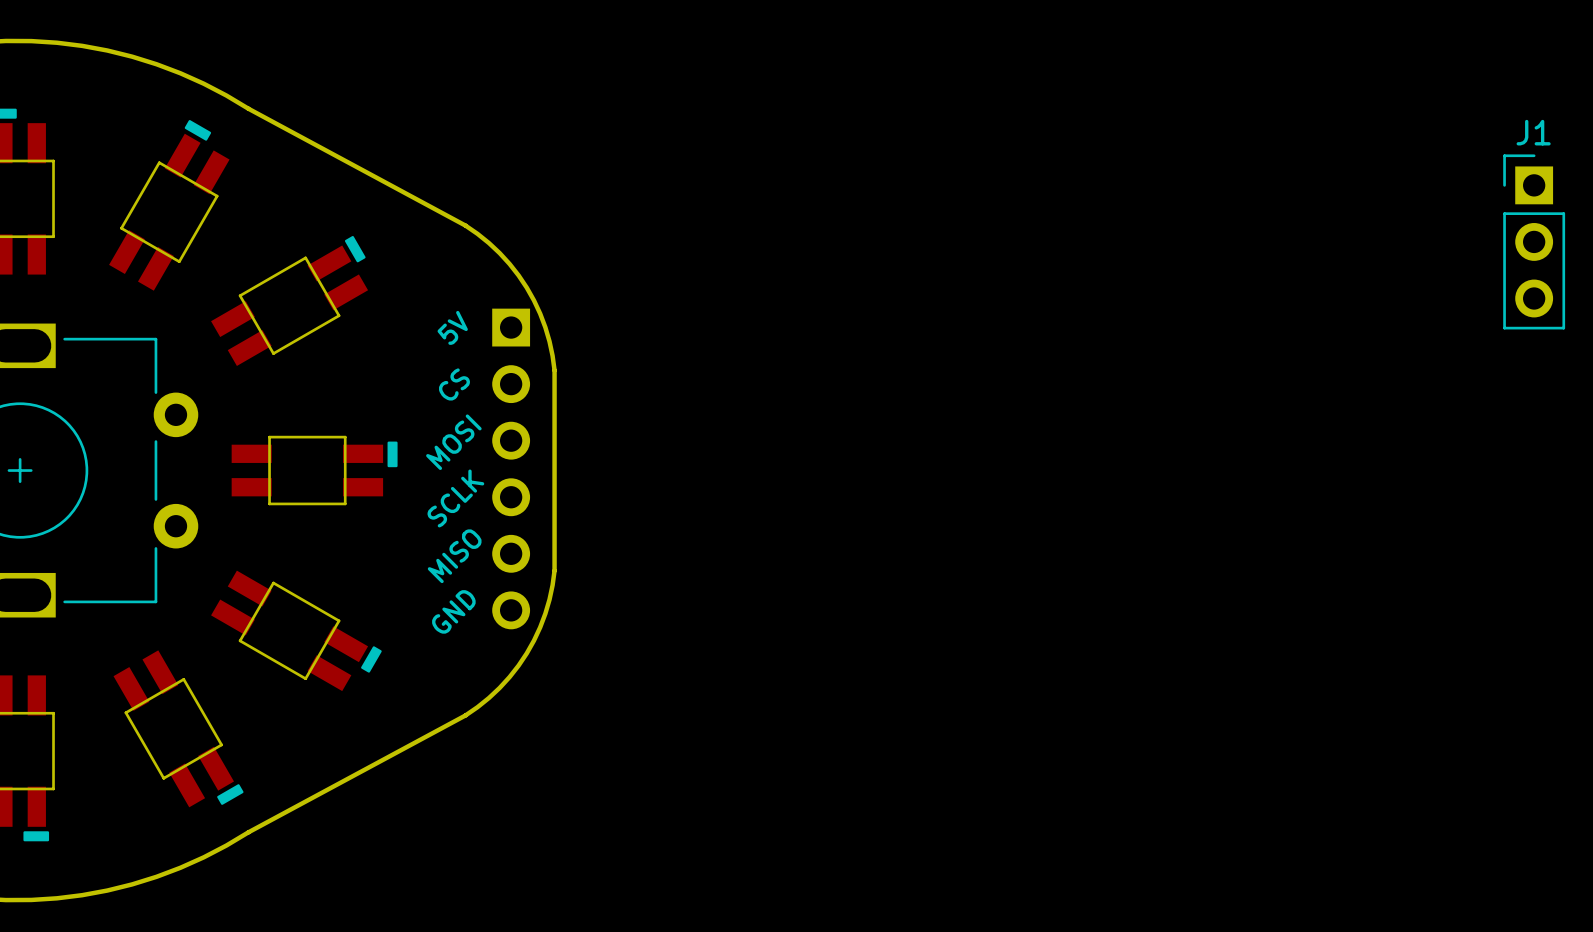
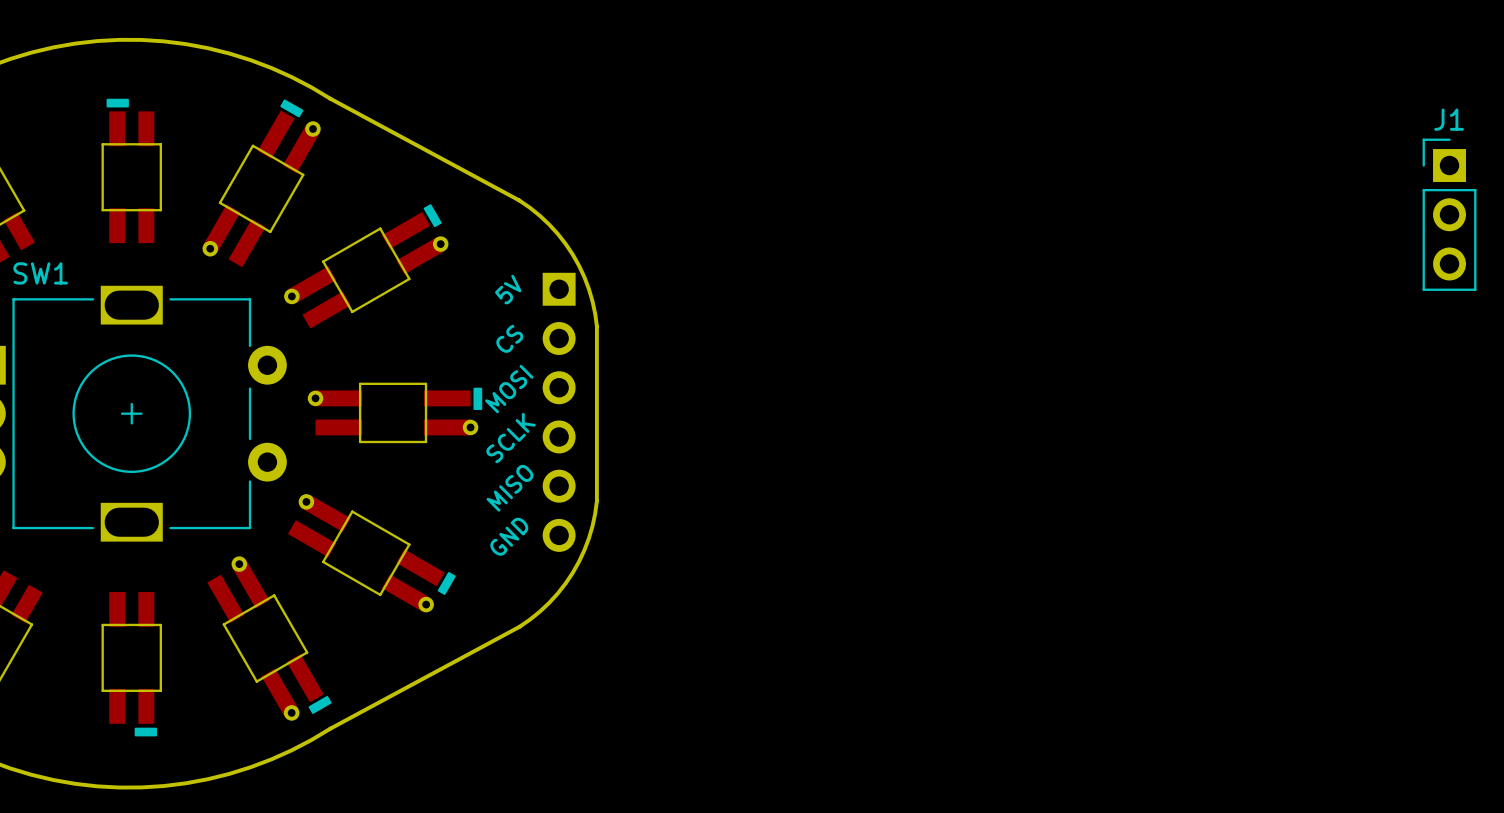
part footprint: [109, 120, 230, 291] -> [202, 99, 321, 268]
part footprint: [211, 235, 369, 366] -> [284, 204, 449, 329]
part footprint: [231, 435, 398, 506] -> [307, 382, 483, 444]
part footprint: [211, 570, 382, 692] -> [287, 494, 456, 613]
part footprint: [113, 650, 244, 808] -> [207, 556, 332, 721]

